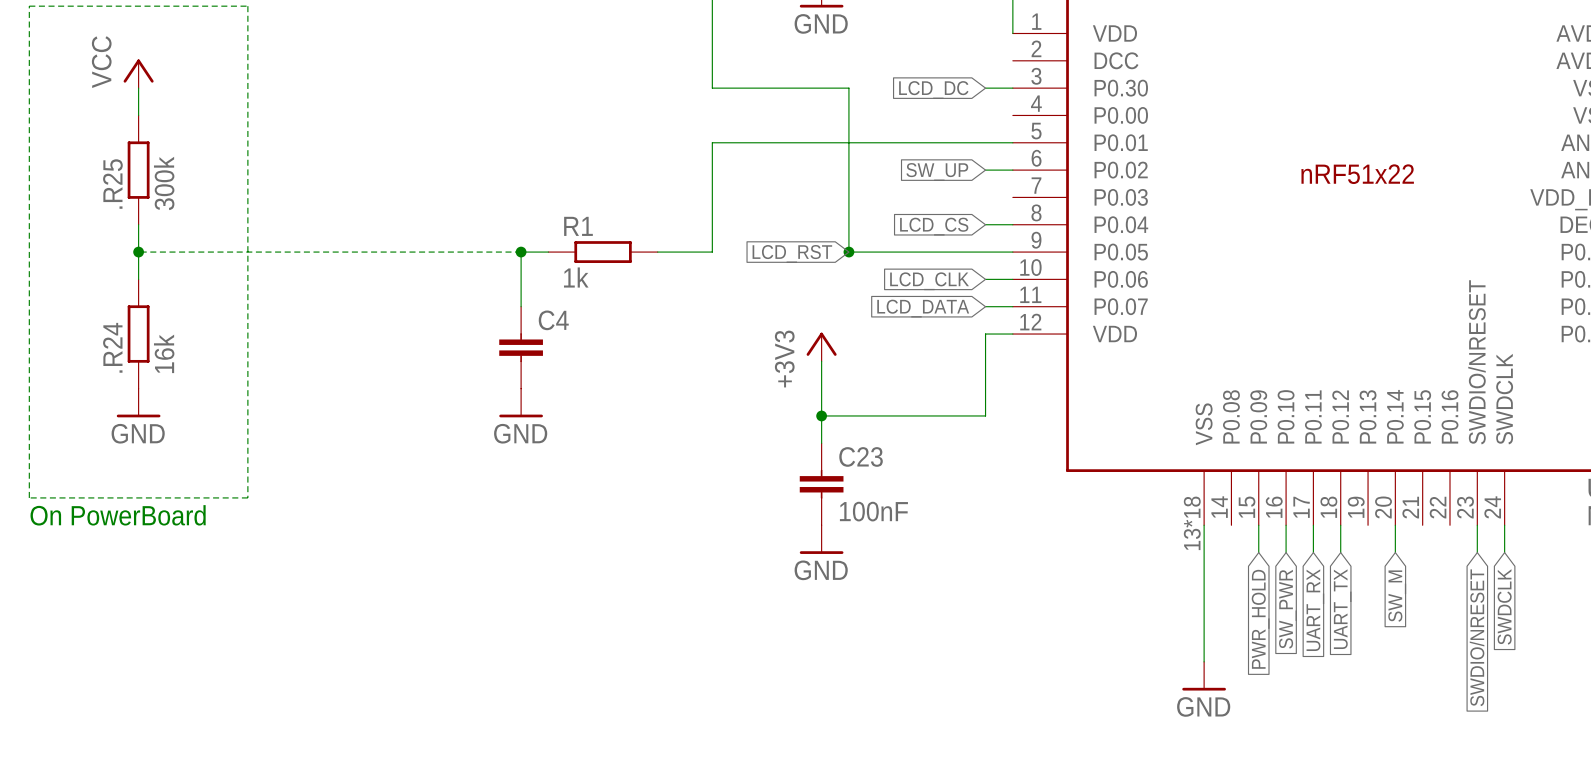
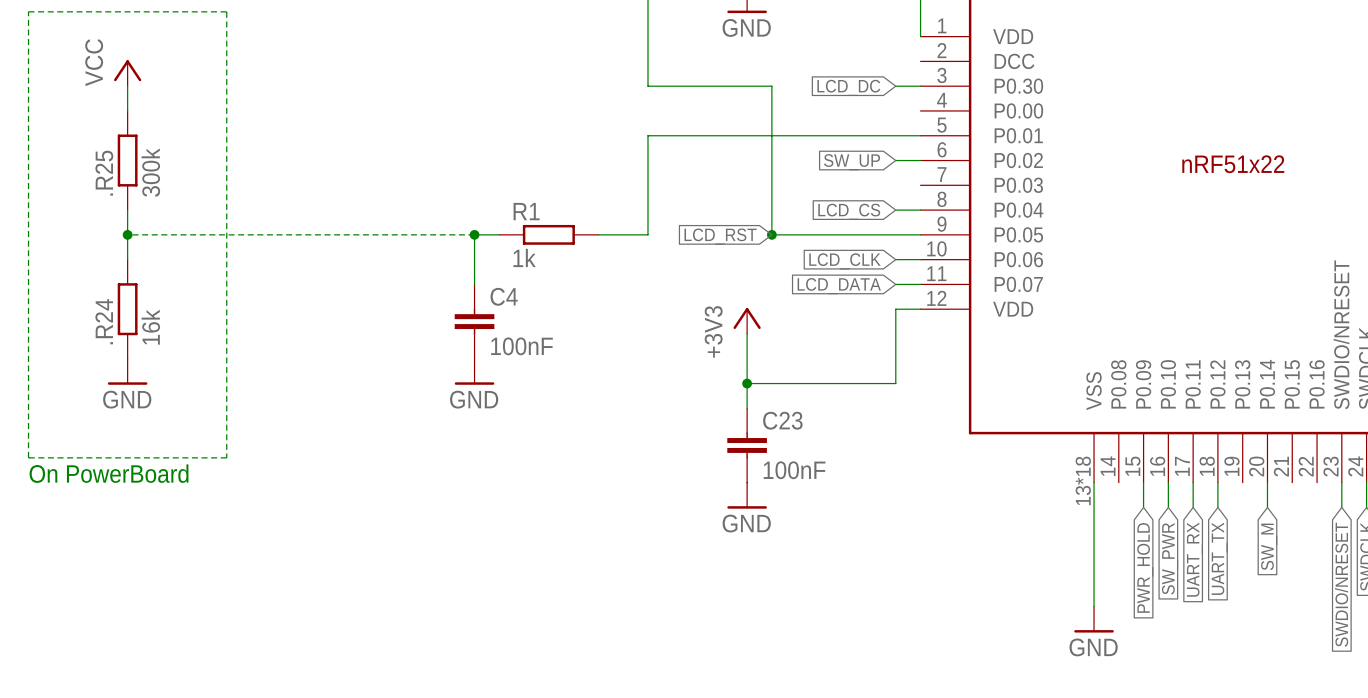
C4 value: none -> 100nF (521, 346)

